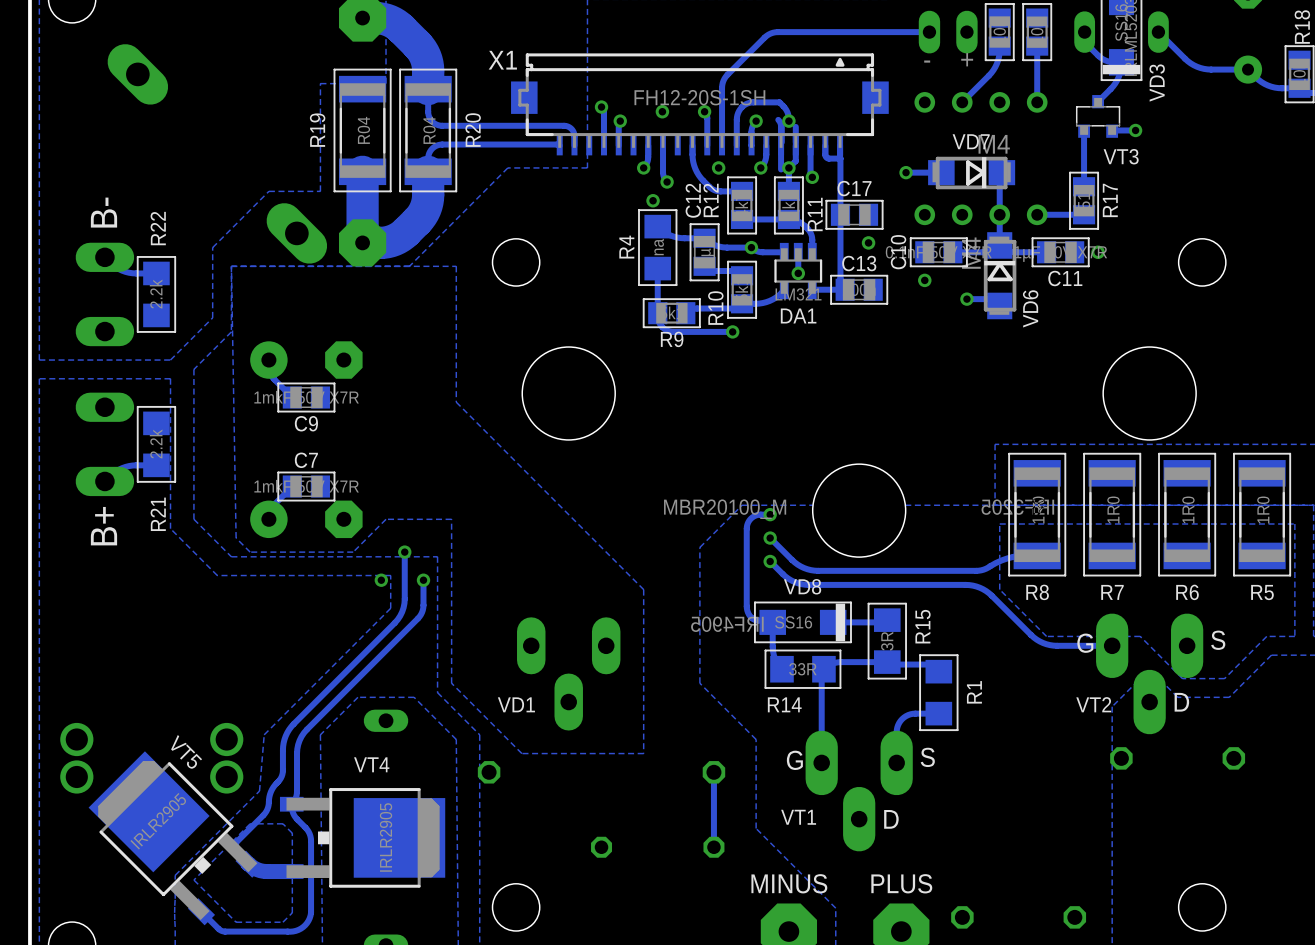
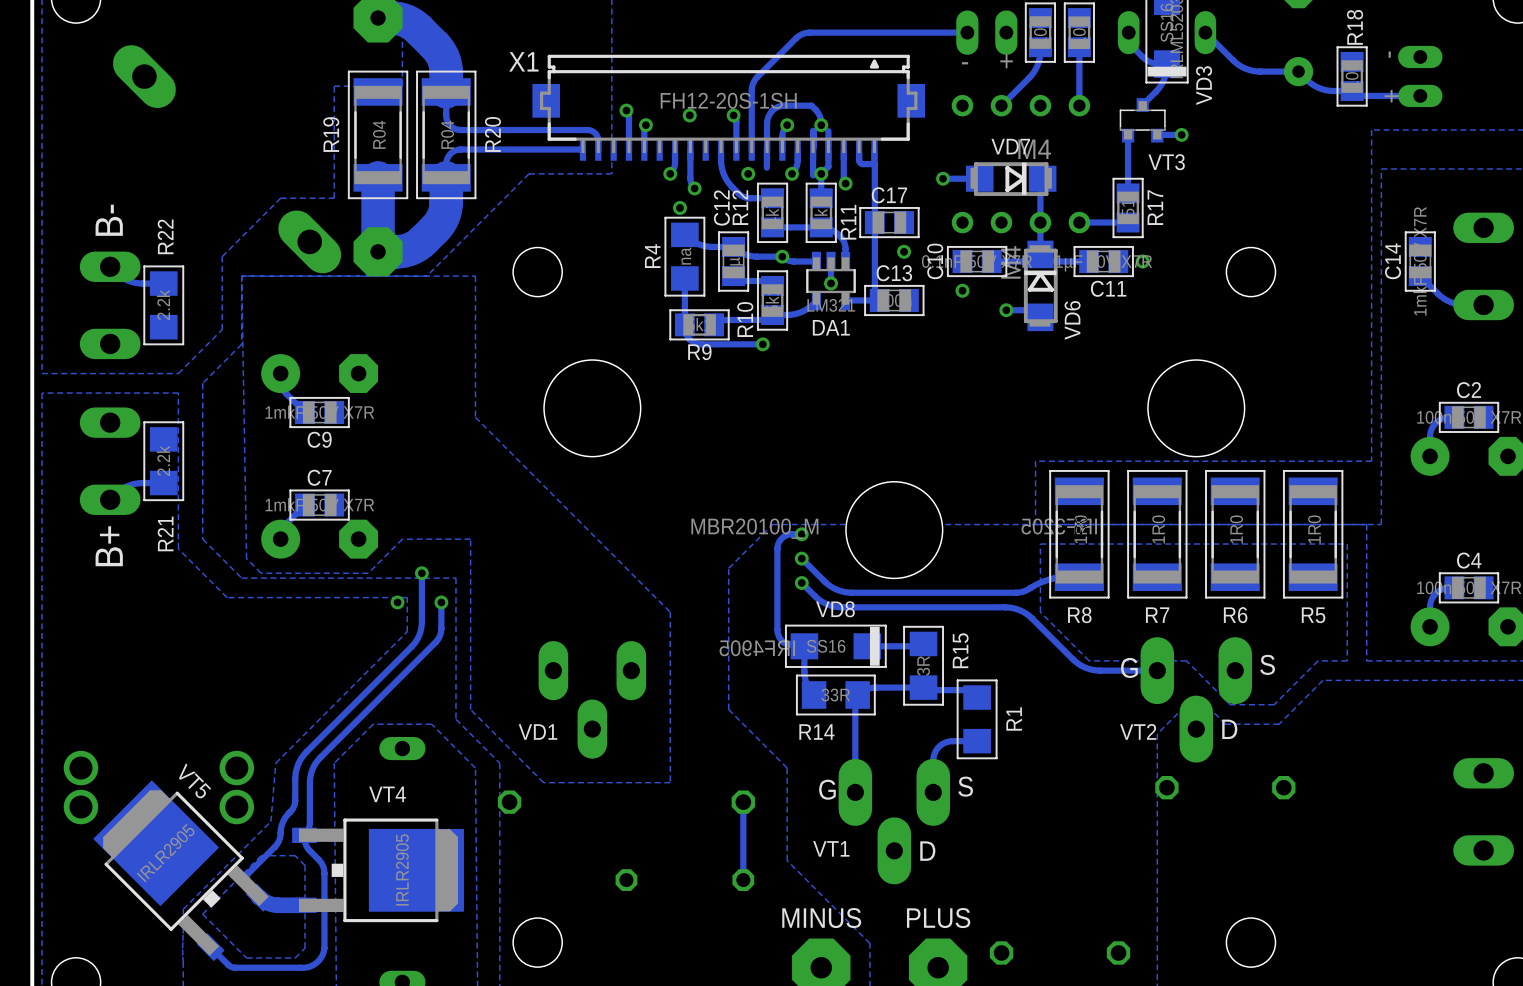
track: (778, 119) (781, 126) -> none
track: none -> (766, 147) (766, 167)

